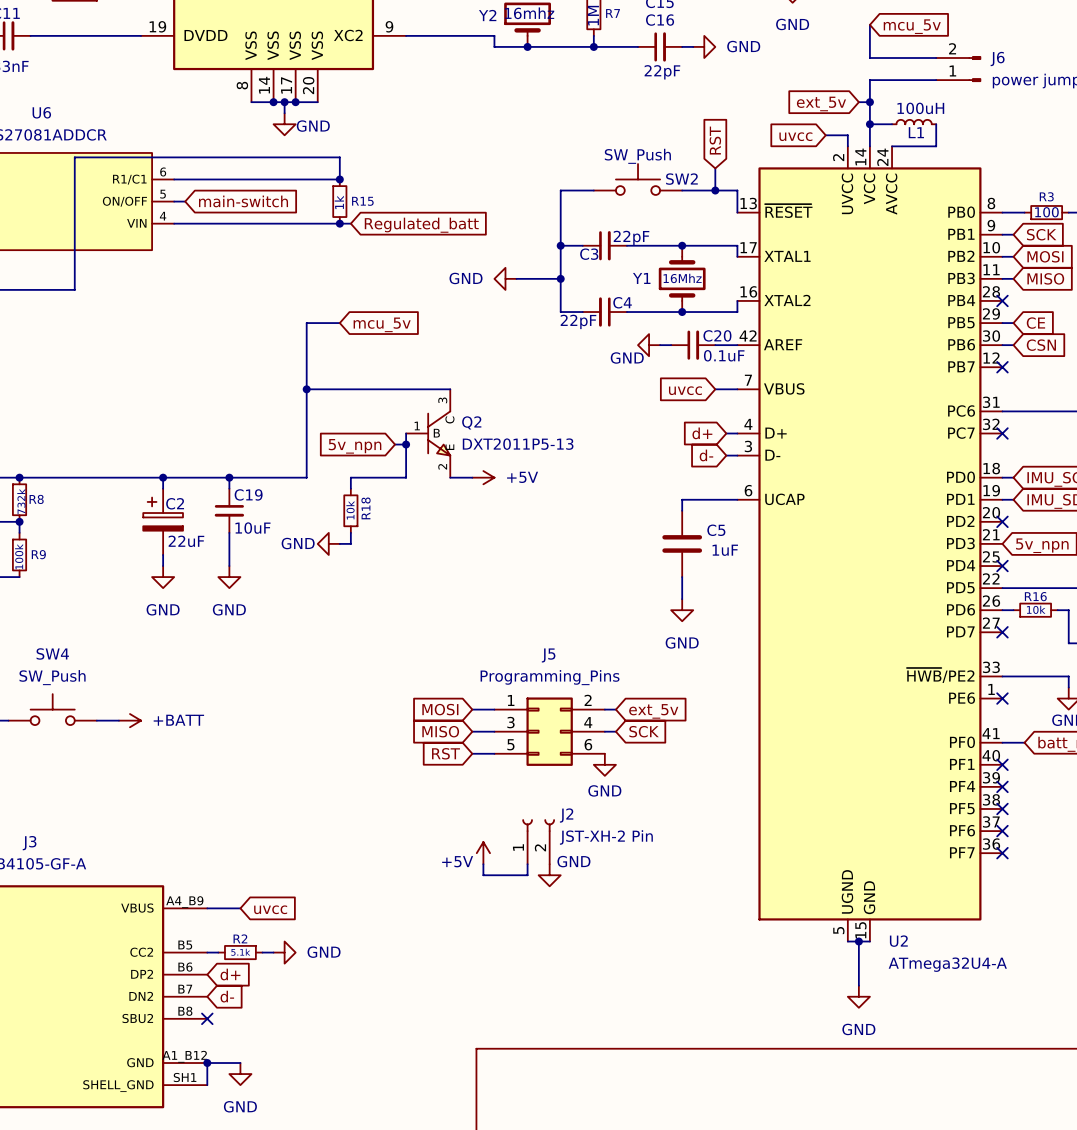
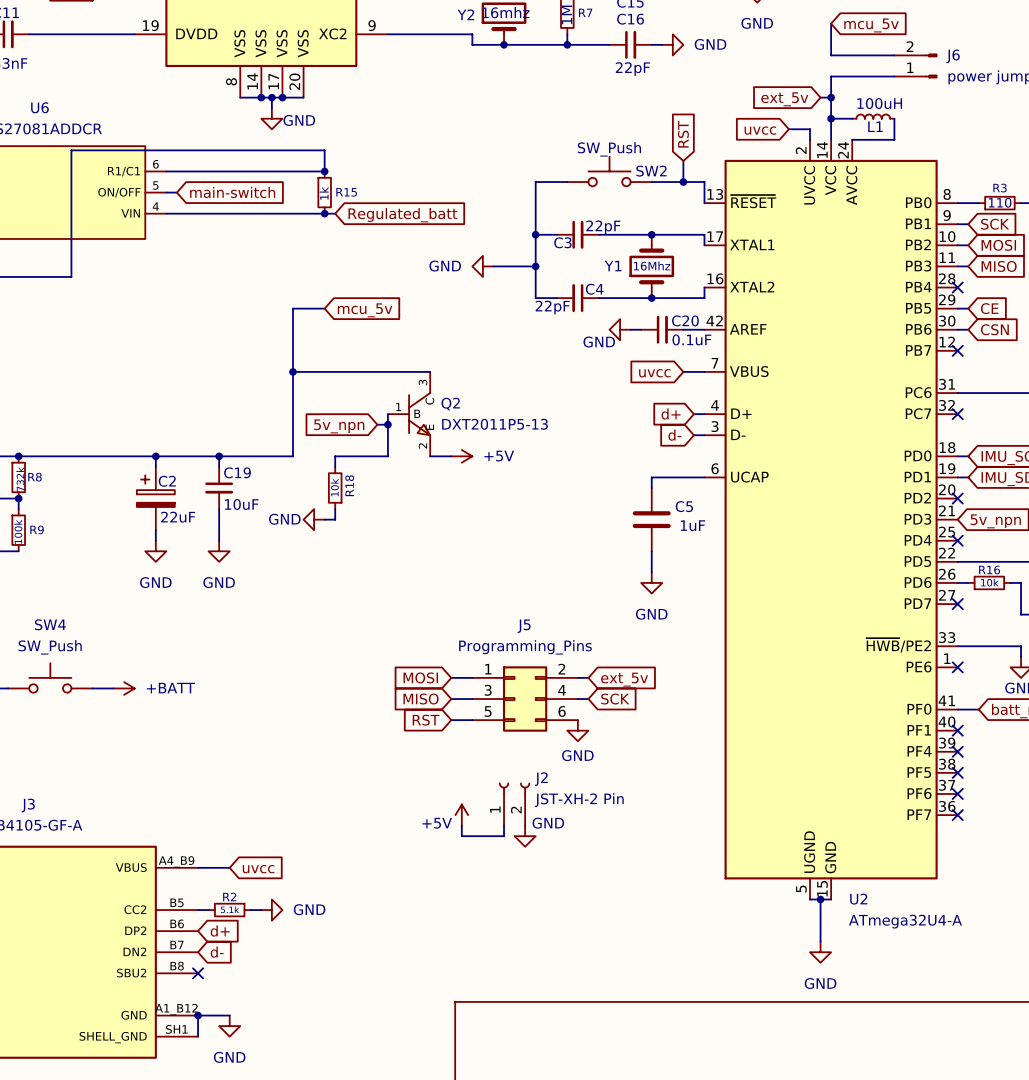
R3 value: 100 (1046, 212) -> 110 (1000, 202)

